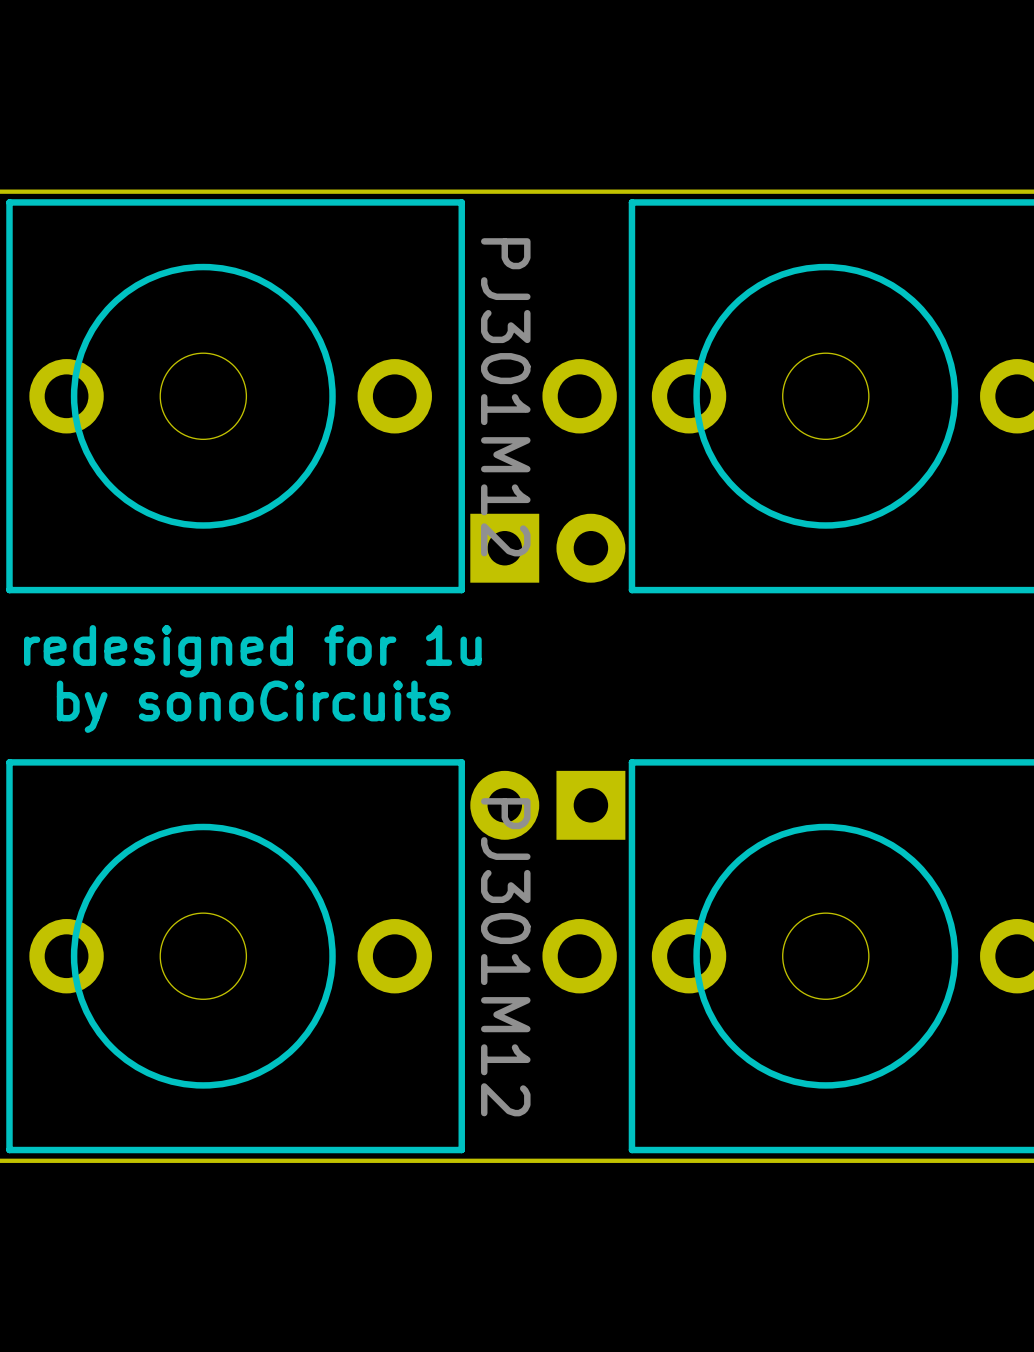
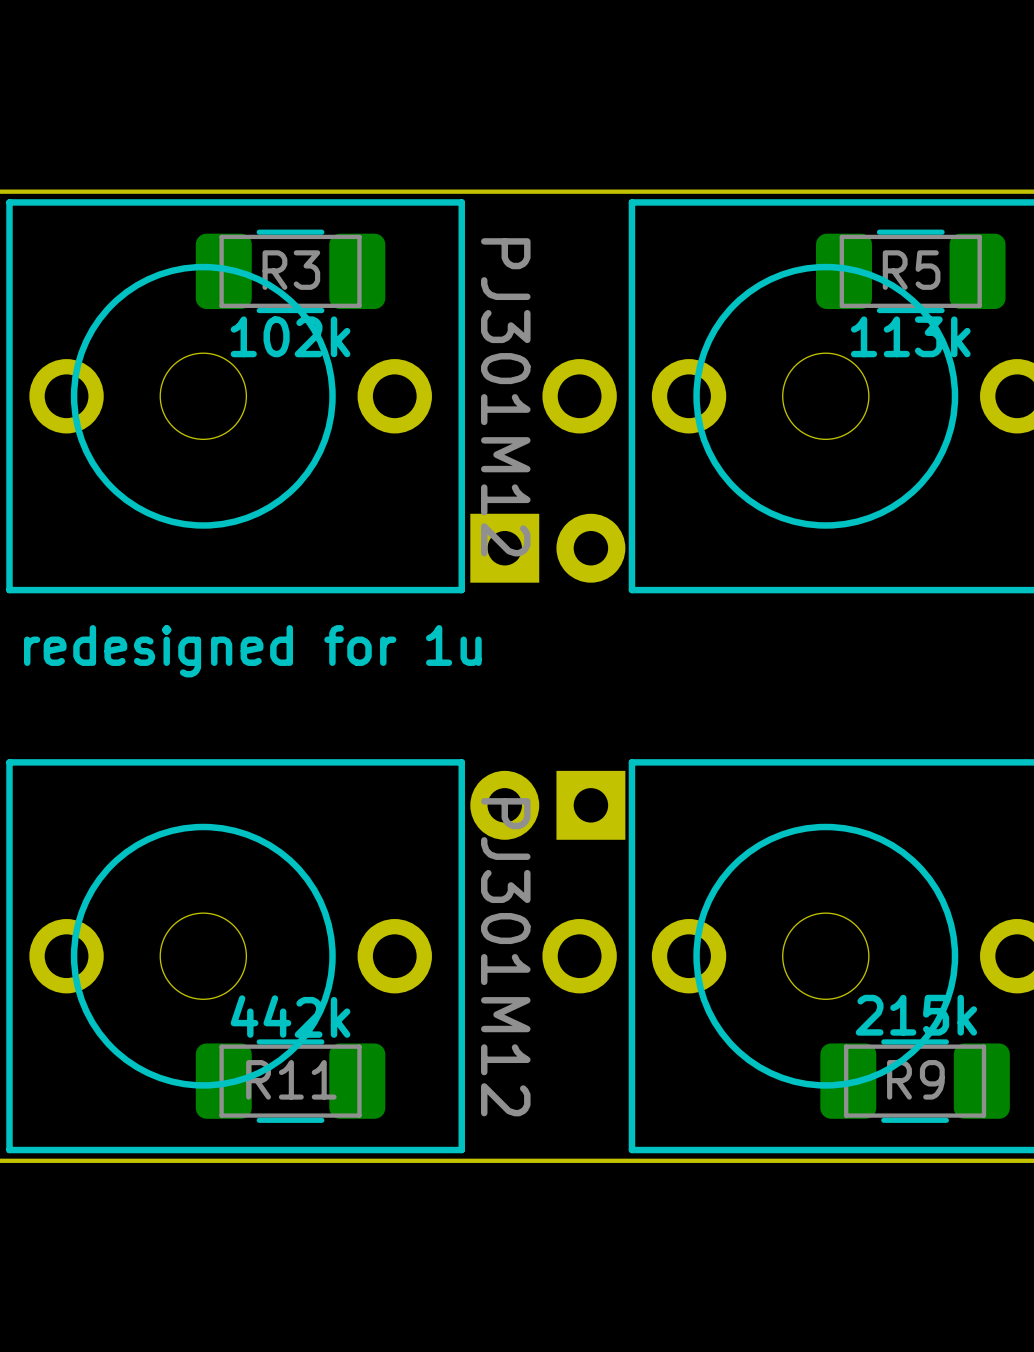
R3: none -> 102k (290, 271)
R5: none -> 113k (910, 271)
text: by sonoCircuits (253, 706) -> none
R11: none -> 442k (290, 1081)
R9: none -> 215k (915, 1081)

